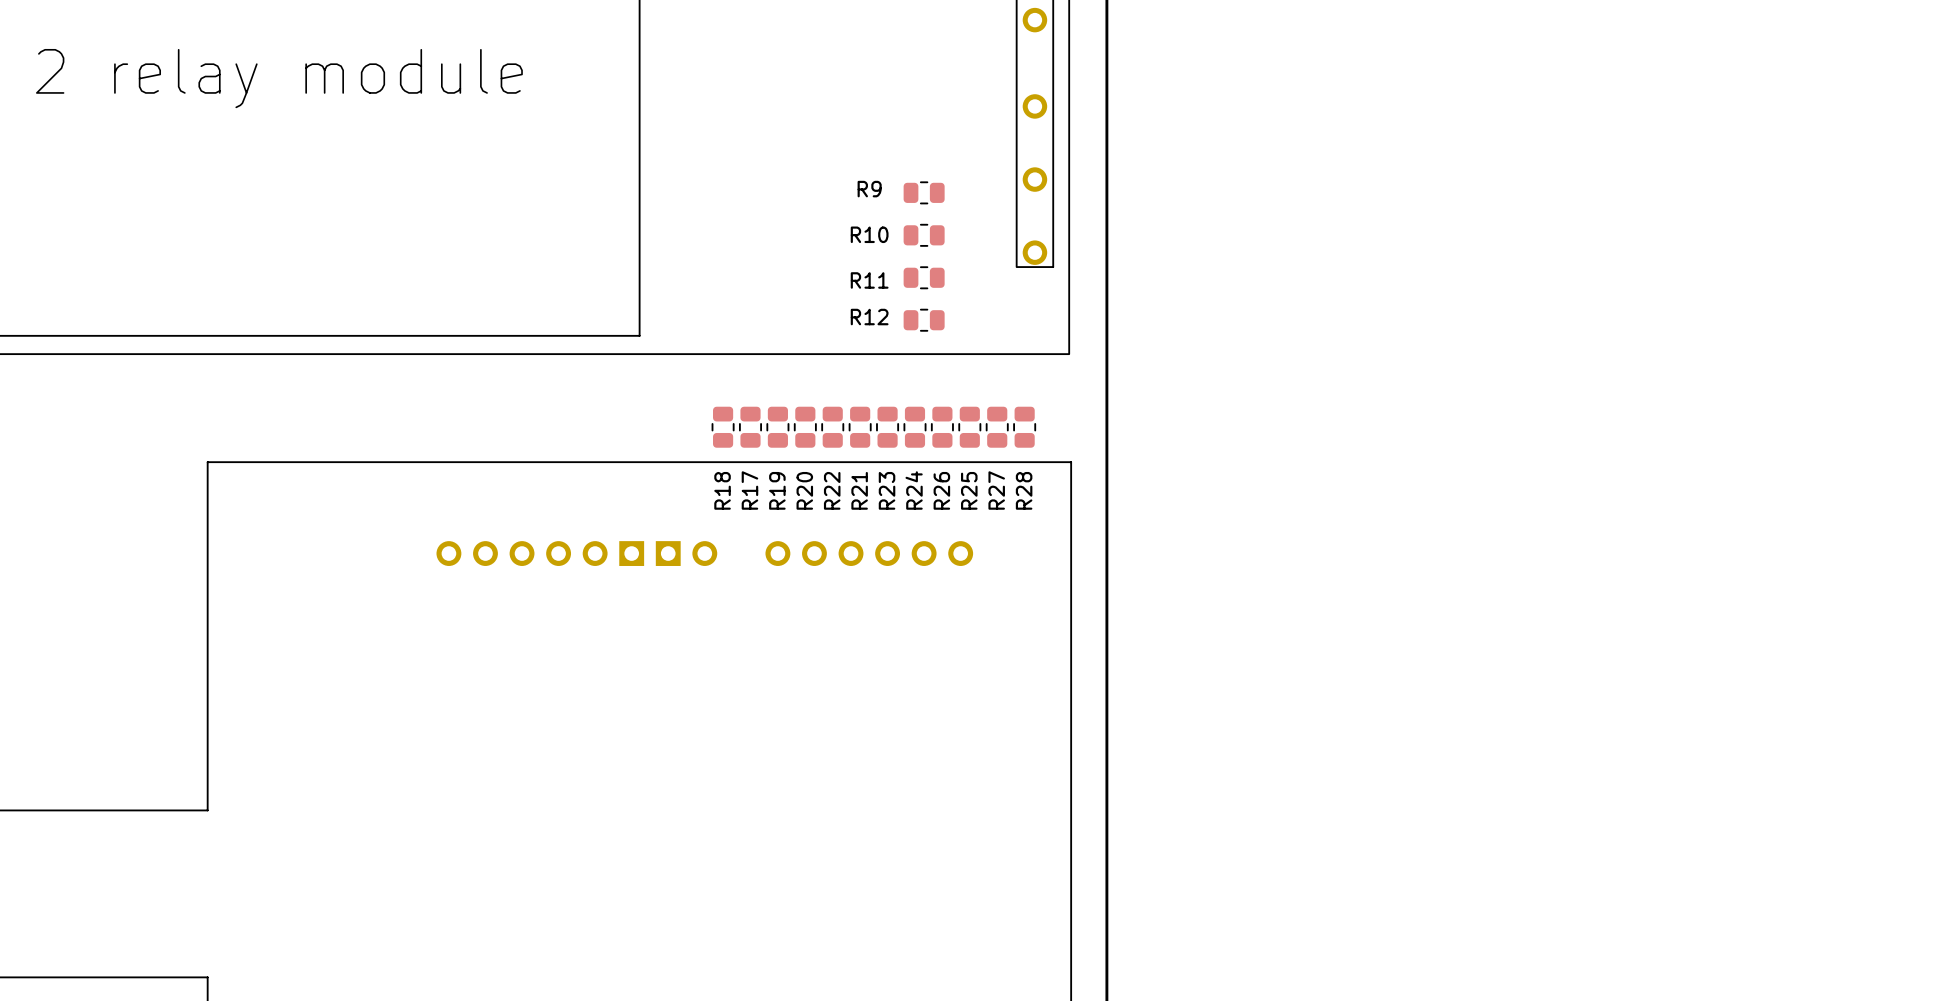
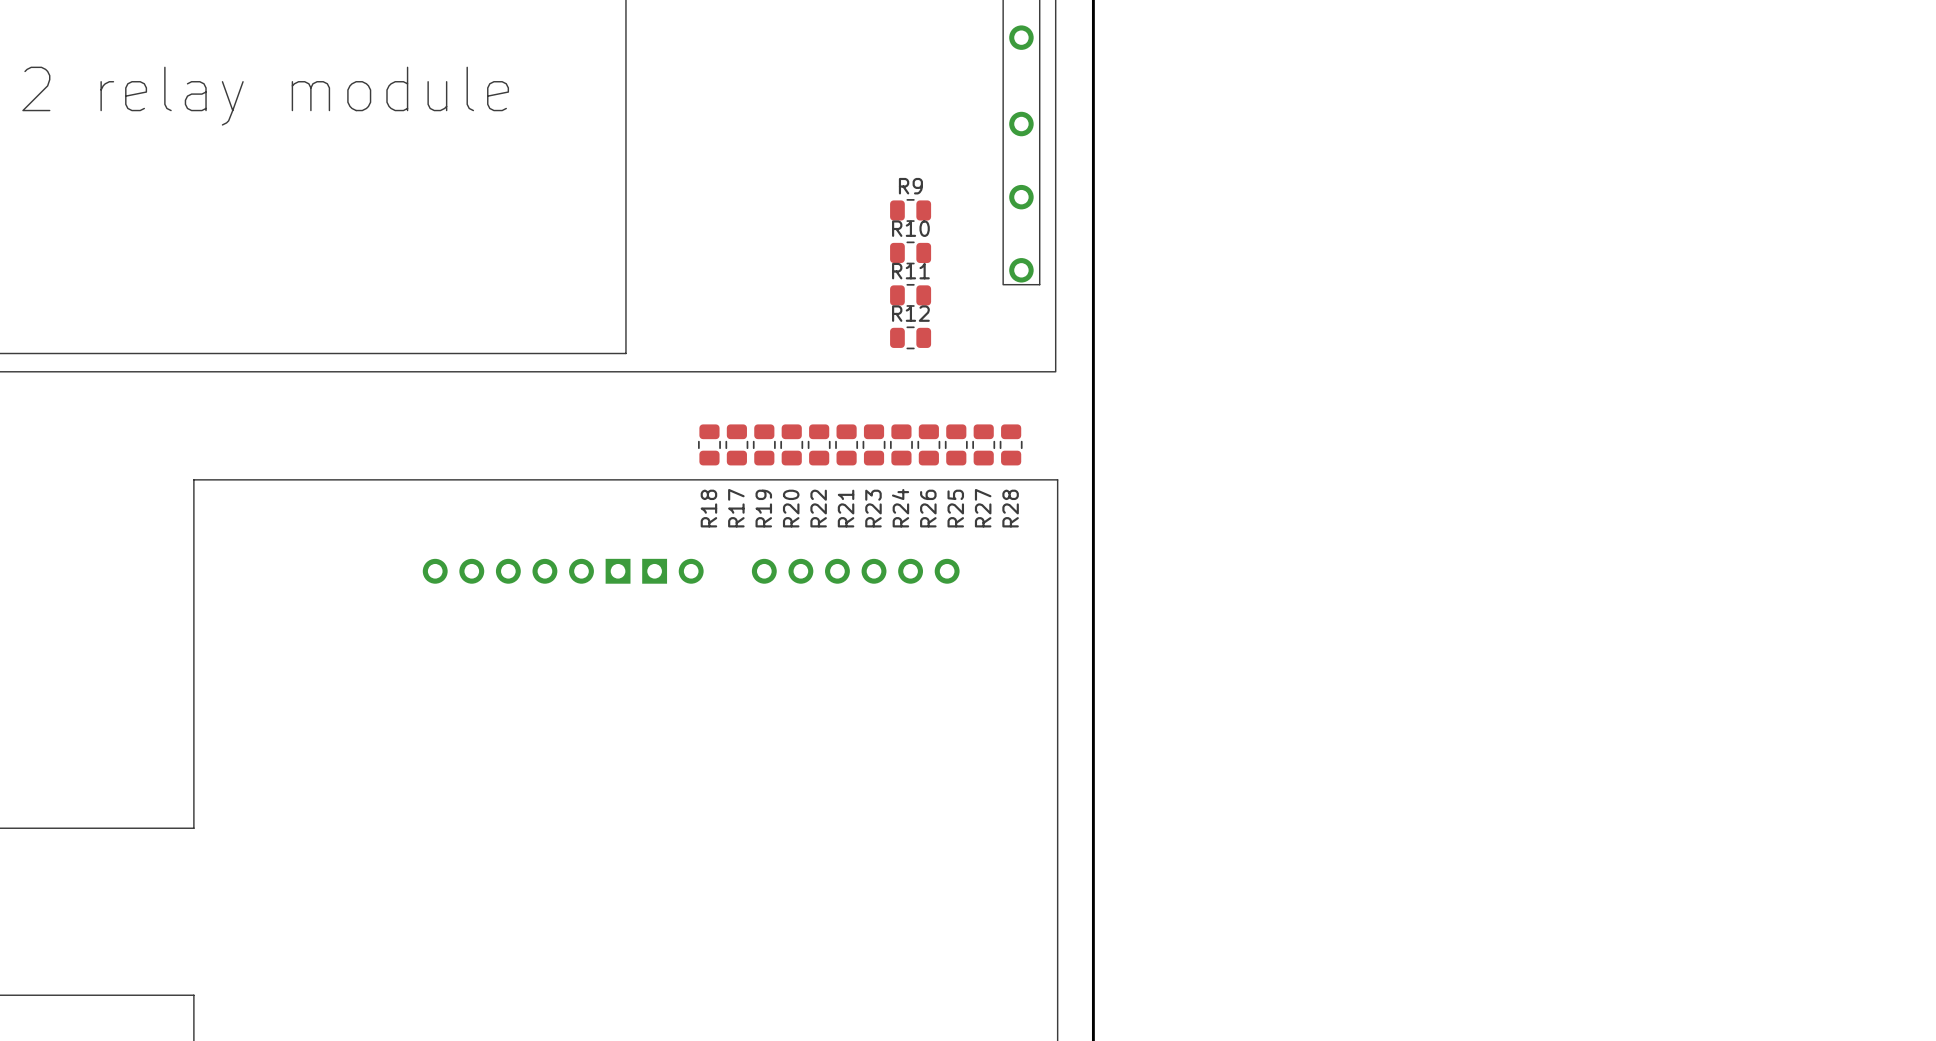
R9 name position: R9 (869, 189) -> R9 (910, 186)
R10 name position: R10 (869, 234) -> R10 (910, 228)
R11 name position: R11 (869, 280) -> R11 (910, 271)
R12 name position: R12 (869, 317) -> R12 (910, 313)

